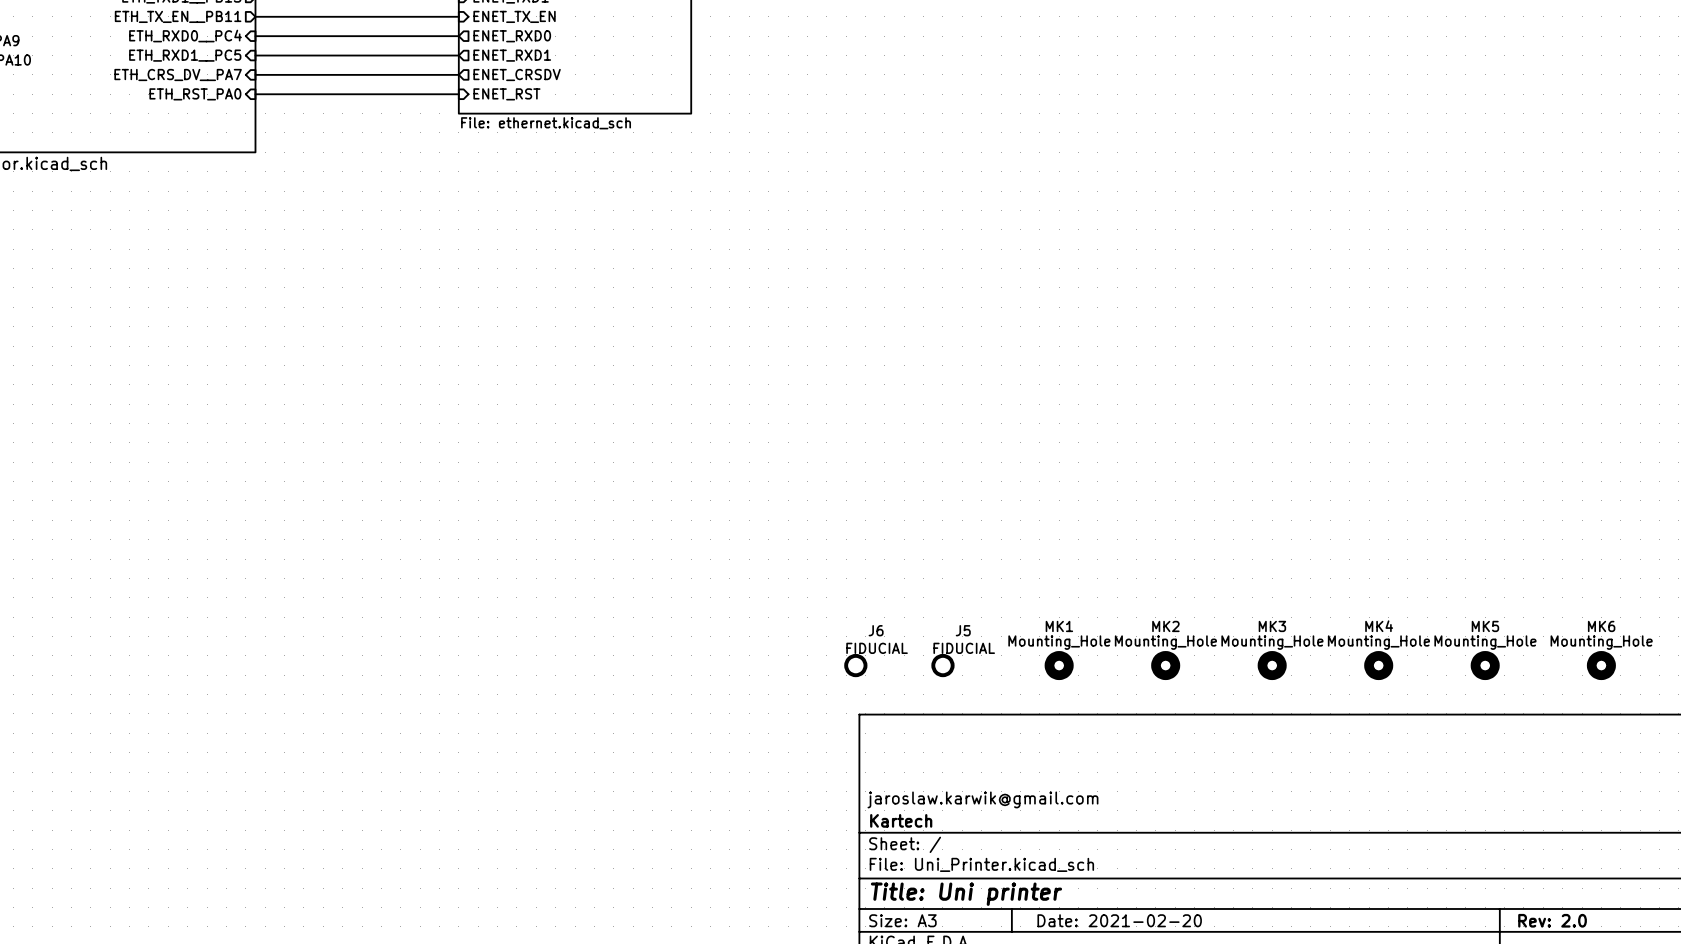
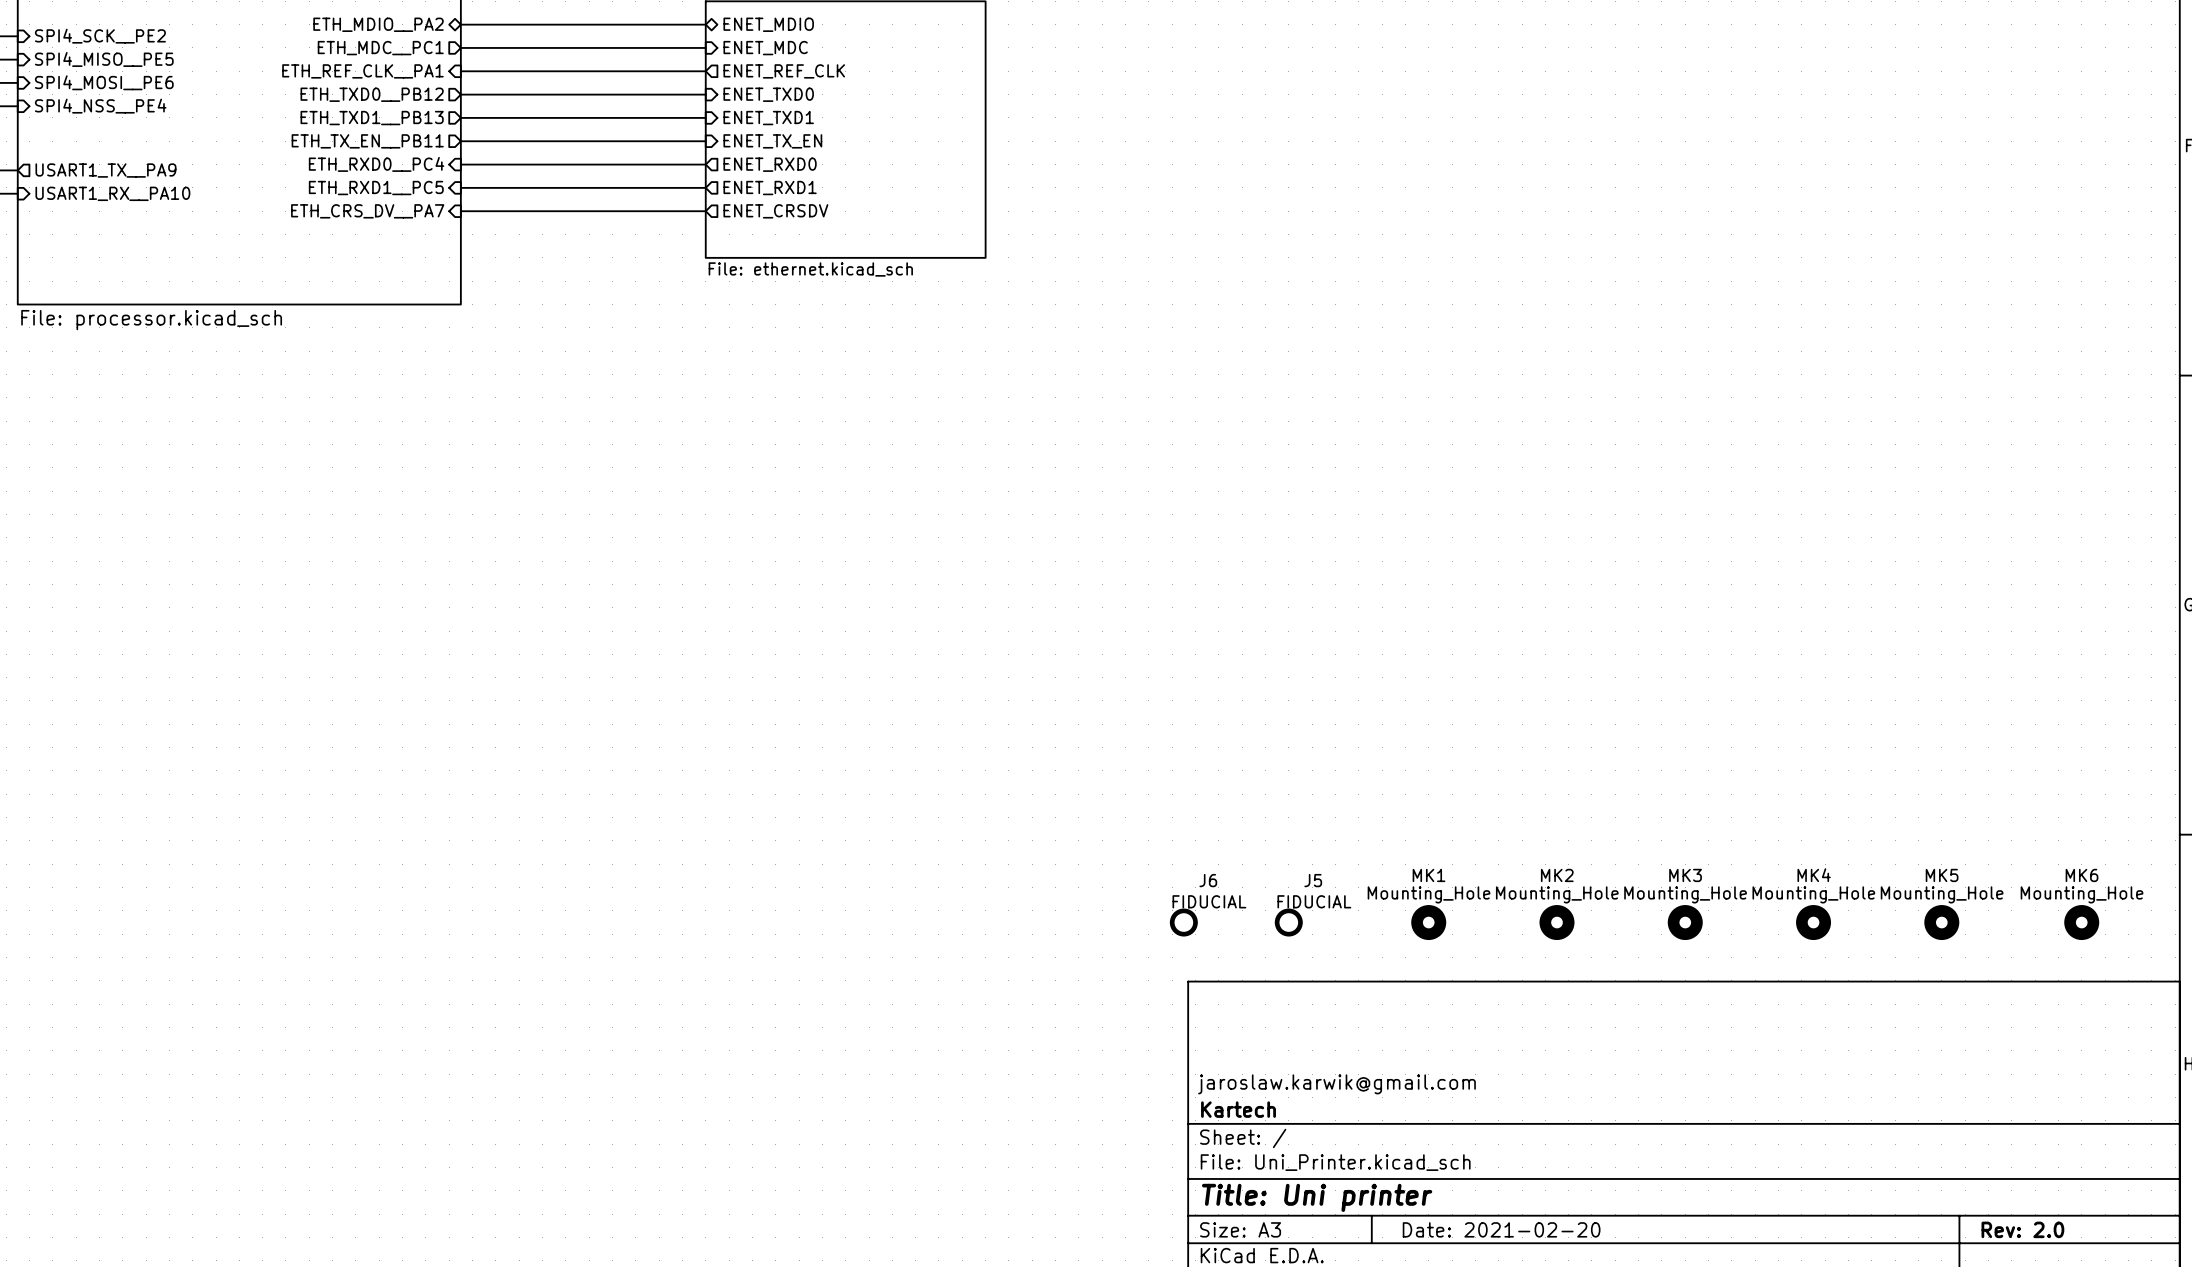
sheet pin: ETH_RST_PA0 (195, 94) -> none
wire: (255, 94) (458, 94) -> none
sheet pin: ENET_RST (506, 94) -> none

